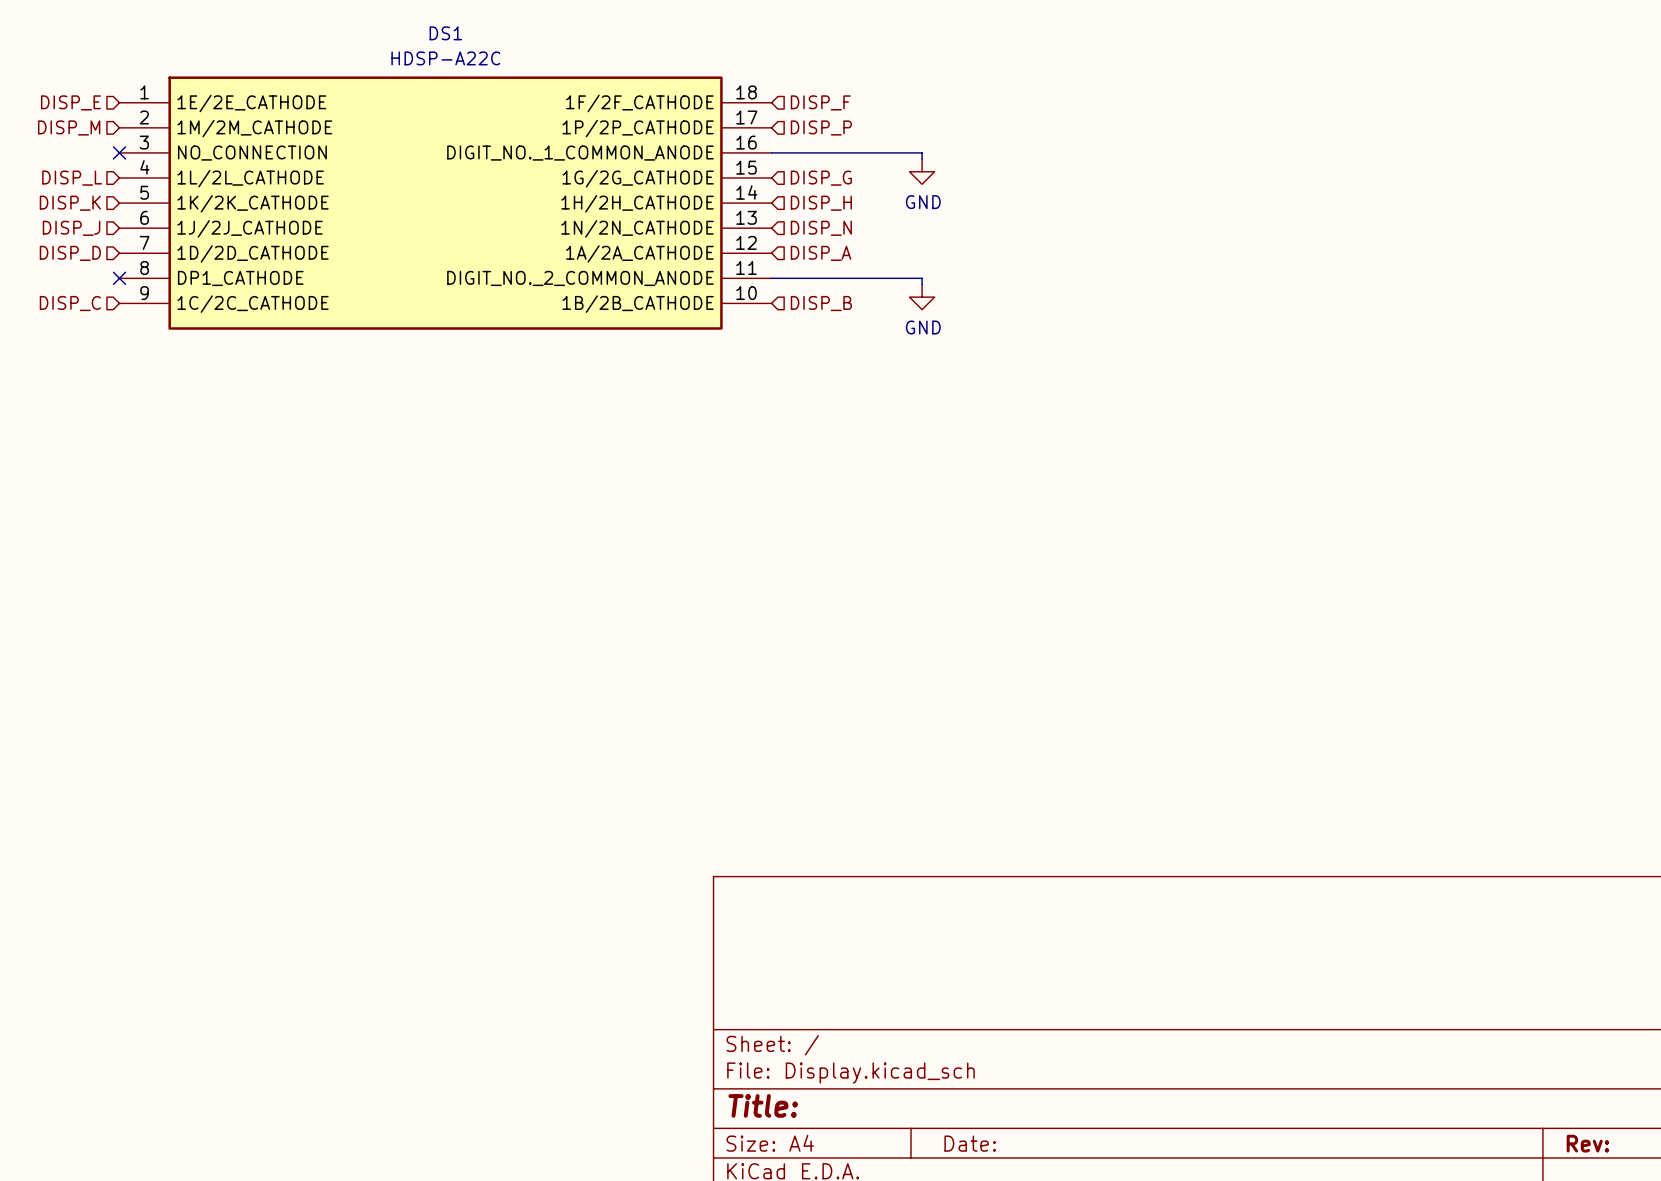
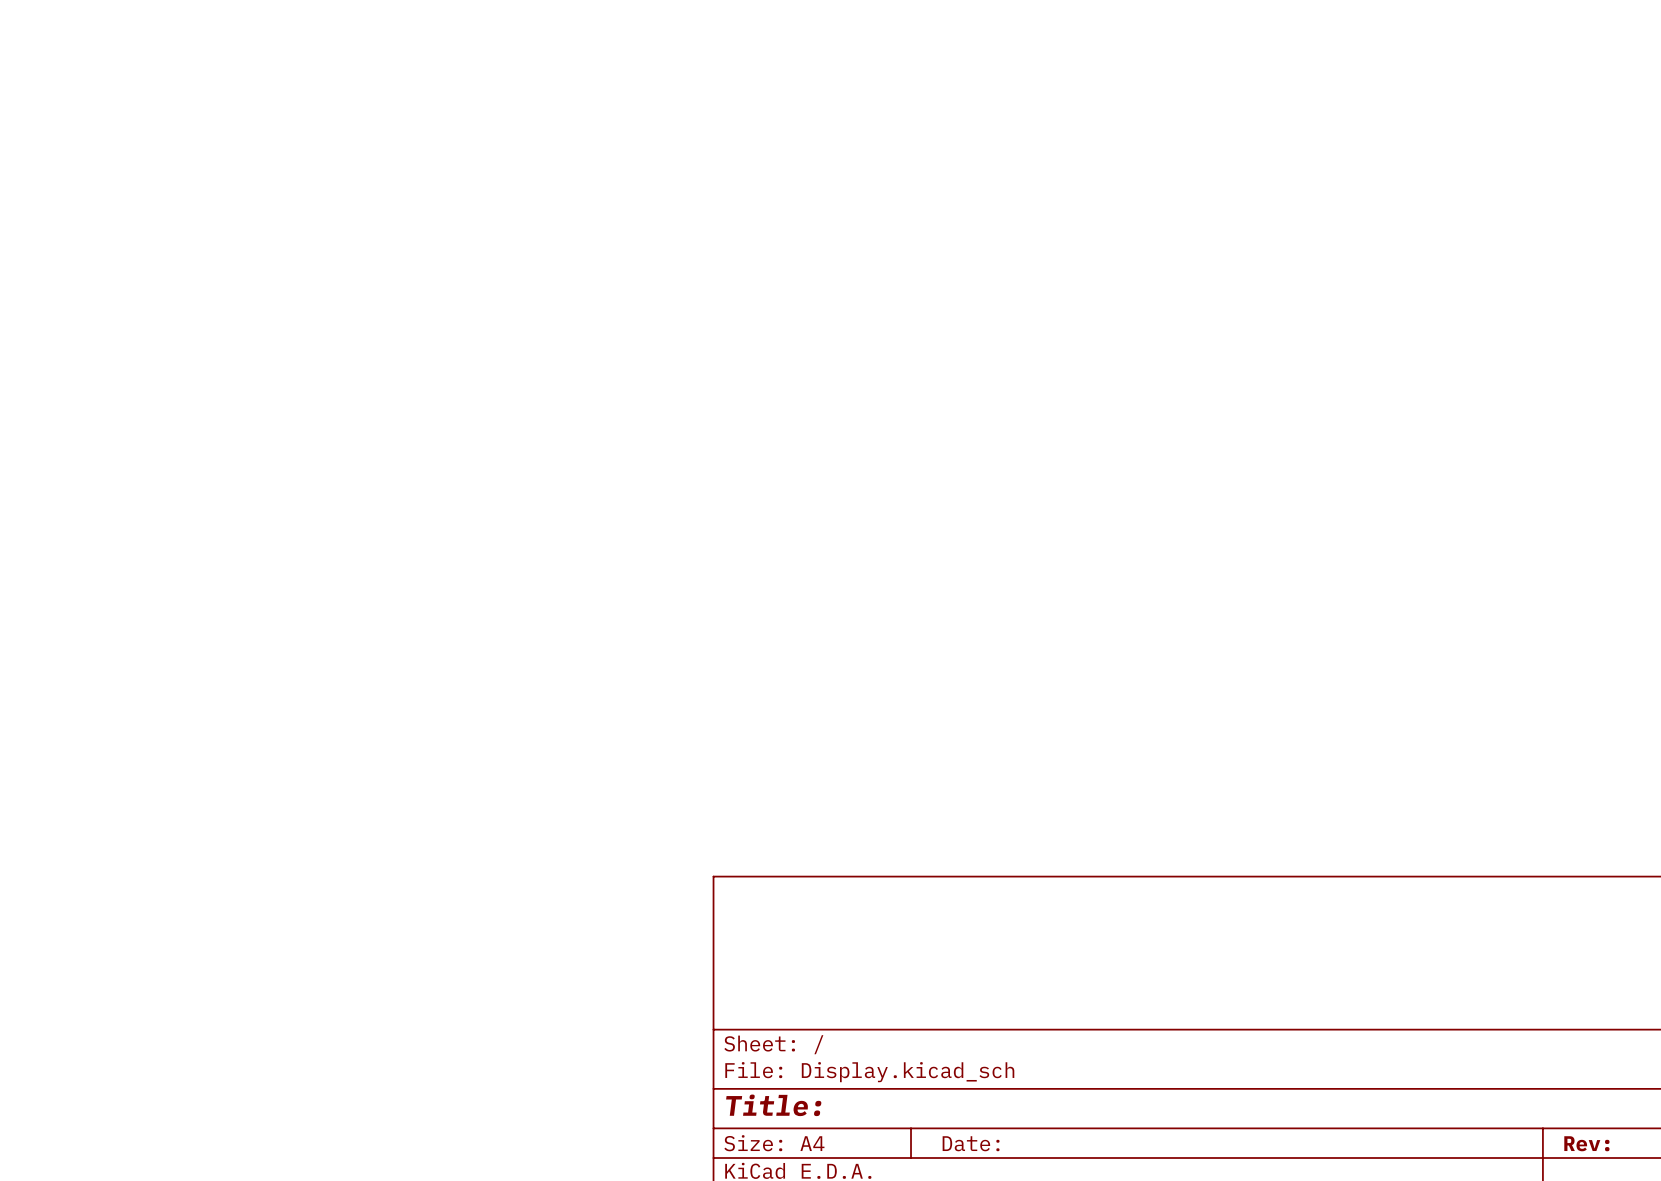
hierarchical label: DISP_E (70, 102) -> none
hierarchical label: DISP_F (820, 102) -> none
hierarchical label: DISP_M (69, 127) -> none
hierarchical label: DISP_P (821, 127) -> none
no-connect mark: (119, 152) -> none
wire: (771, 152) (922, 152) (922, 159) -> none
power symbol: GND (922, 171) -> none
hierarchical label: DISP_L (72, 178) -> none
hierarchical label: DISP_G (821, 178) -> none
hierarchical label: DISP_K (70, 203) -> none
DS1: HDSP-A22C (445, 203) -> none
hierarchical label: DISP_H (821, 203) -> none
hierarchical label: DISP_J (71, 228) -> none
hierarchical label: DISP_N (821, 228) -> none
hierarchical label: DISP_D (70, 253) -> none
hierarchical label: DISP_A (821, 253) -> none
no-connect mark: (119, 278) -> none
wire: (771, 278) (922, 278) (922, 284) -> none
power symbol: GND (922, 297) -> none
hierarchical label: DISP_C (70, 303) -> none
hierarchical label: DISP_B (821, 303) -> none

